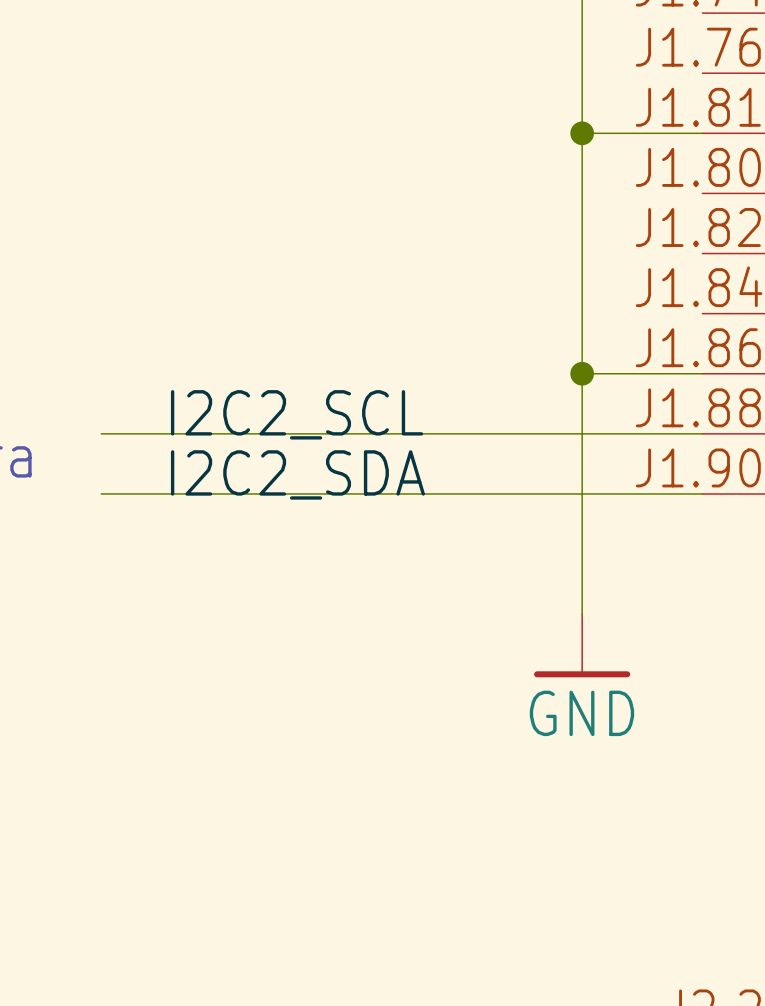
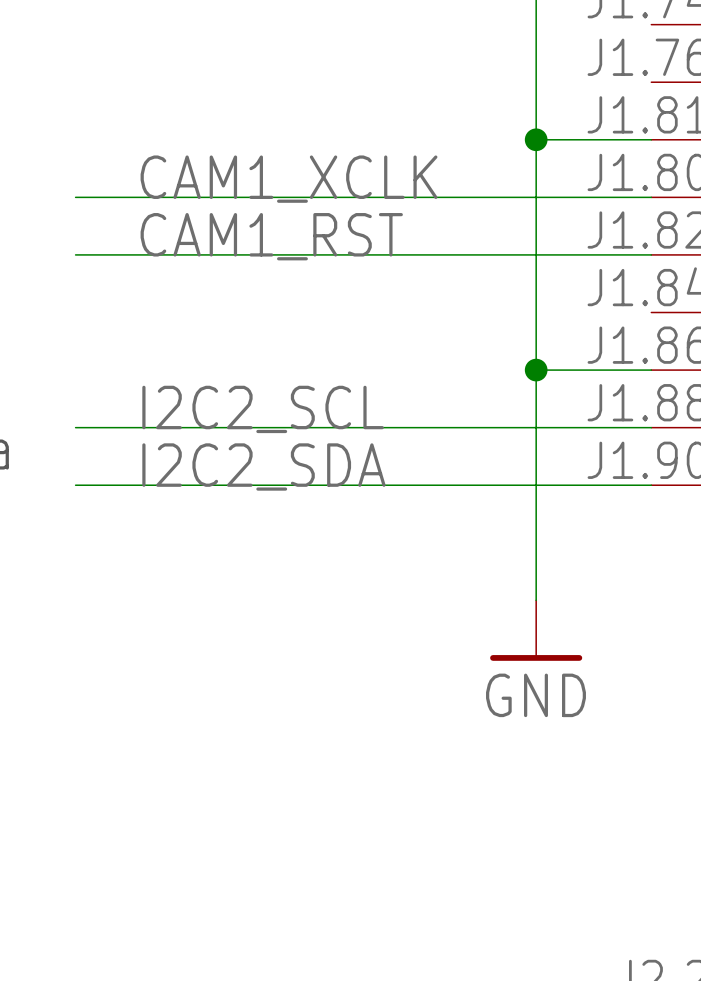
label: none -> CAM1_XCLK (289, 179)
wire: none -> (75, 197) (651, 197)
label: none -> CAM1_RST (271, 236)
wire: none -> (75, 254) (651, 254)

